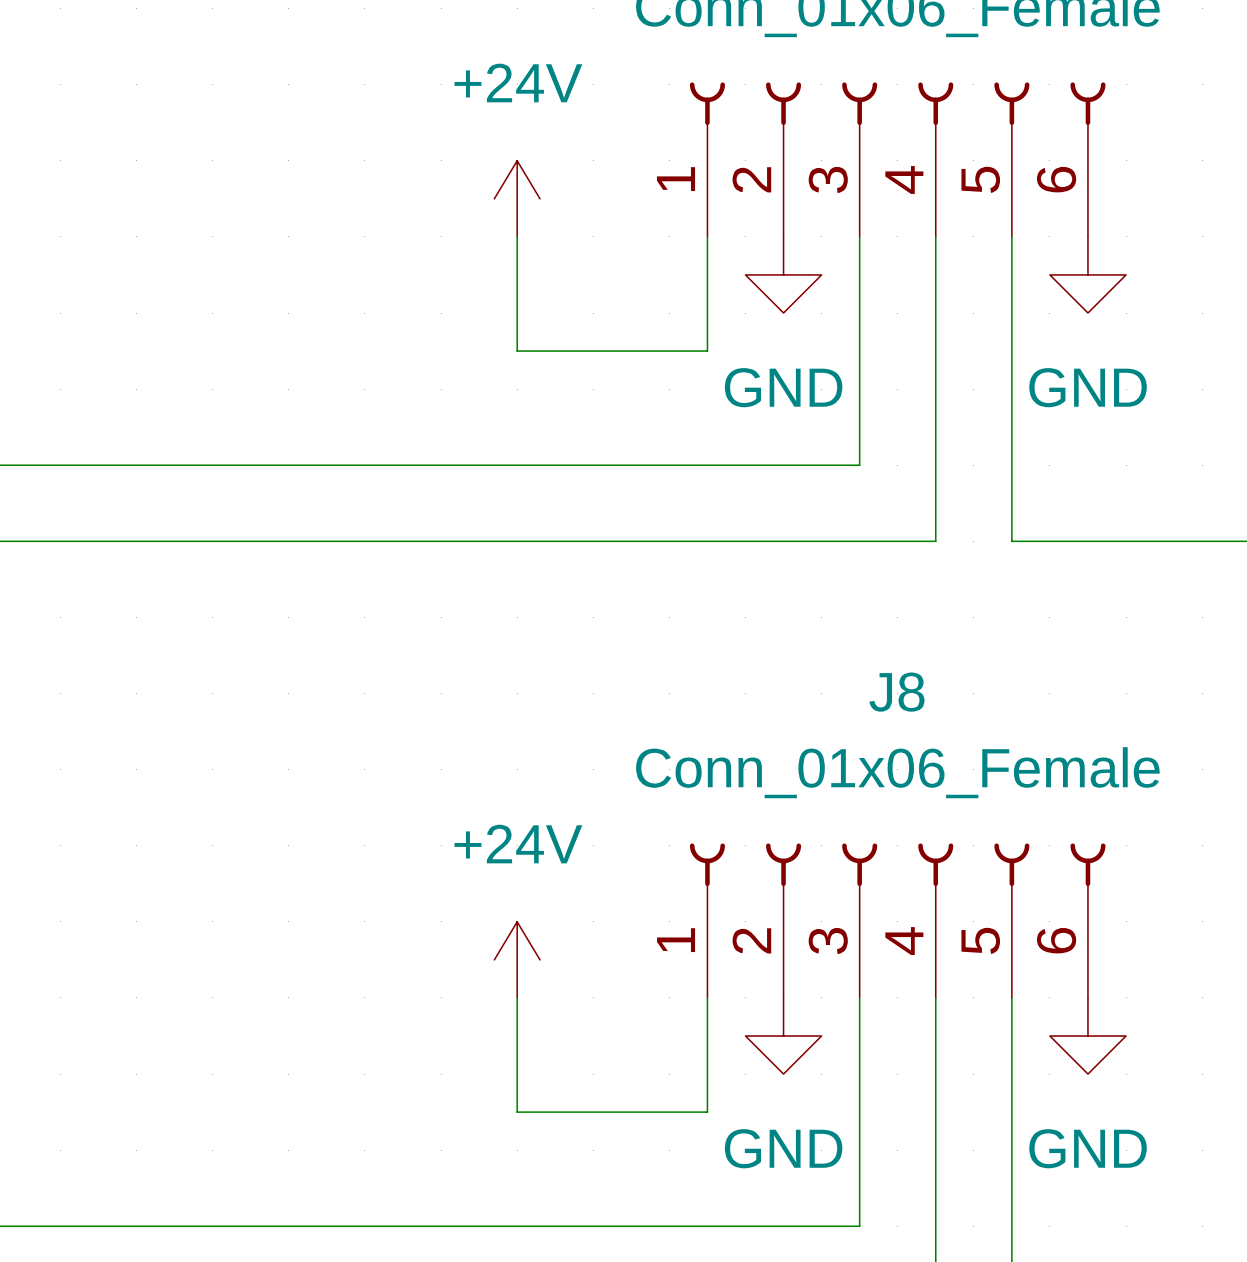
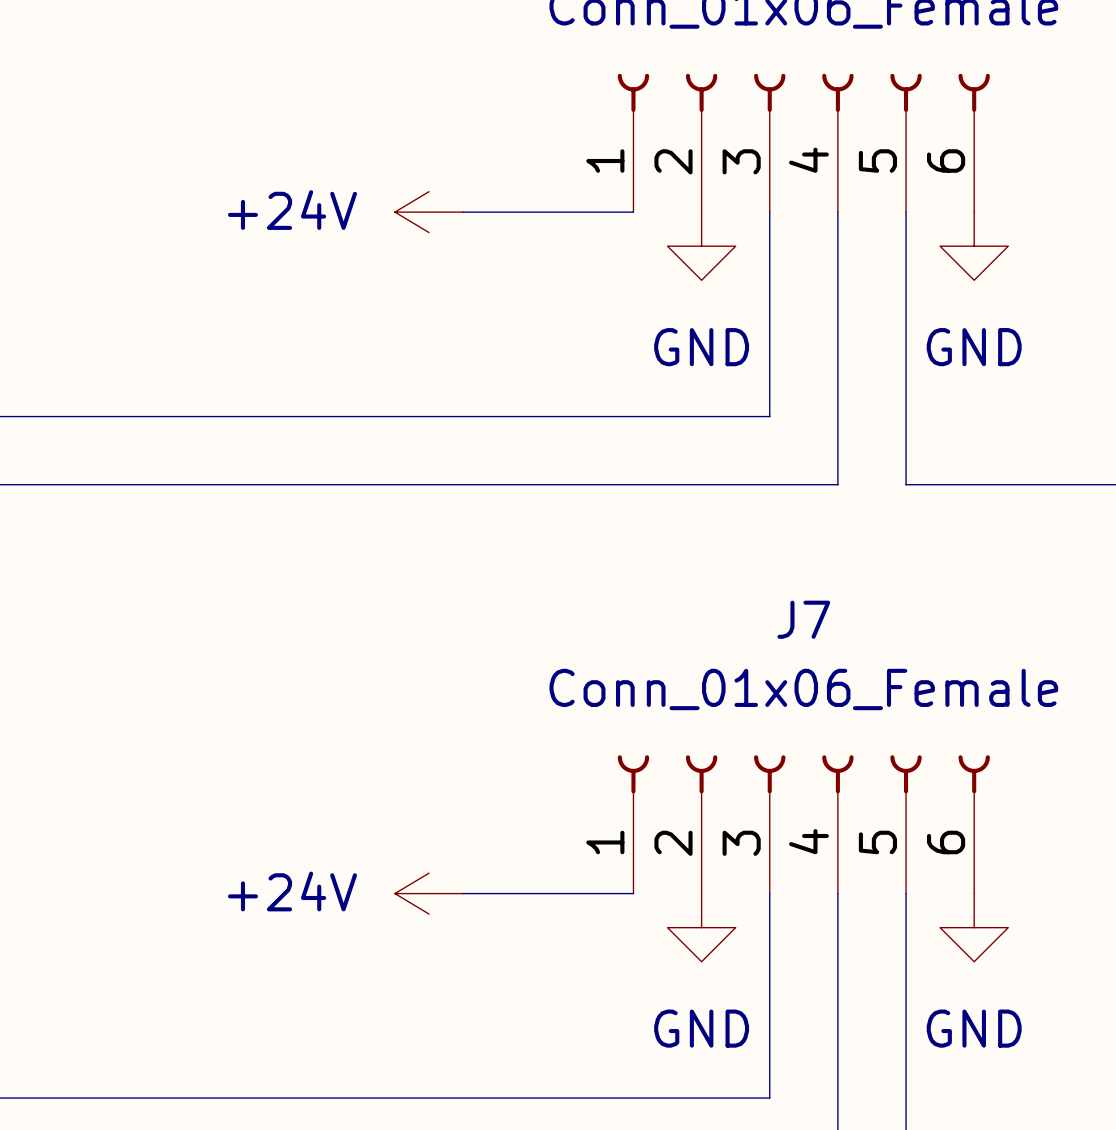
power symbol rotation: 0° (517, 198) -> 90° counterclockwise (429, 212)
power symbol position: +24V (517, 198) -> +24V (429, 212)
wire: (517, 236) (517, 351) (707, 351) (707, 236) -> (463, 212) (633, 212)
J8 name: J8 (896, 692) -> J7 (803, 619)
power symbol rotation: 0° (517, 959) -> 90° counterclockwise (429, 893)
power symbol position: +24V (517, 959) -> +24V (429, 893)
wire: (517, 997) (517, 1112) (707, 1112) (707, 997) -> (463, 893) (633, 893)

